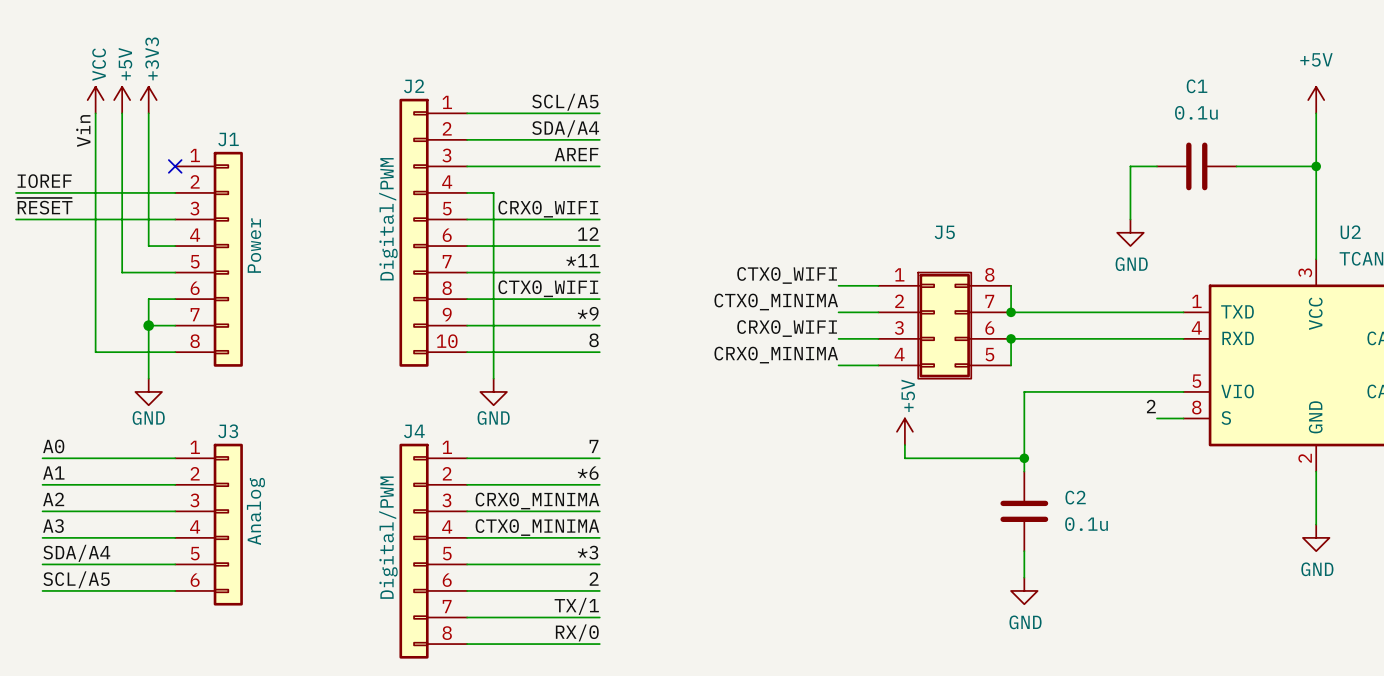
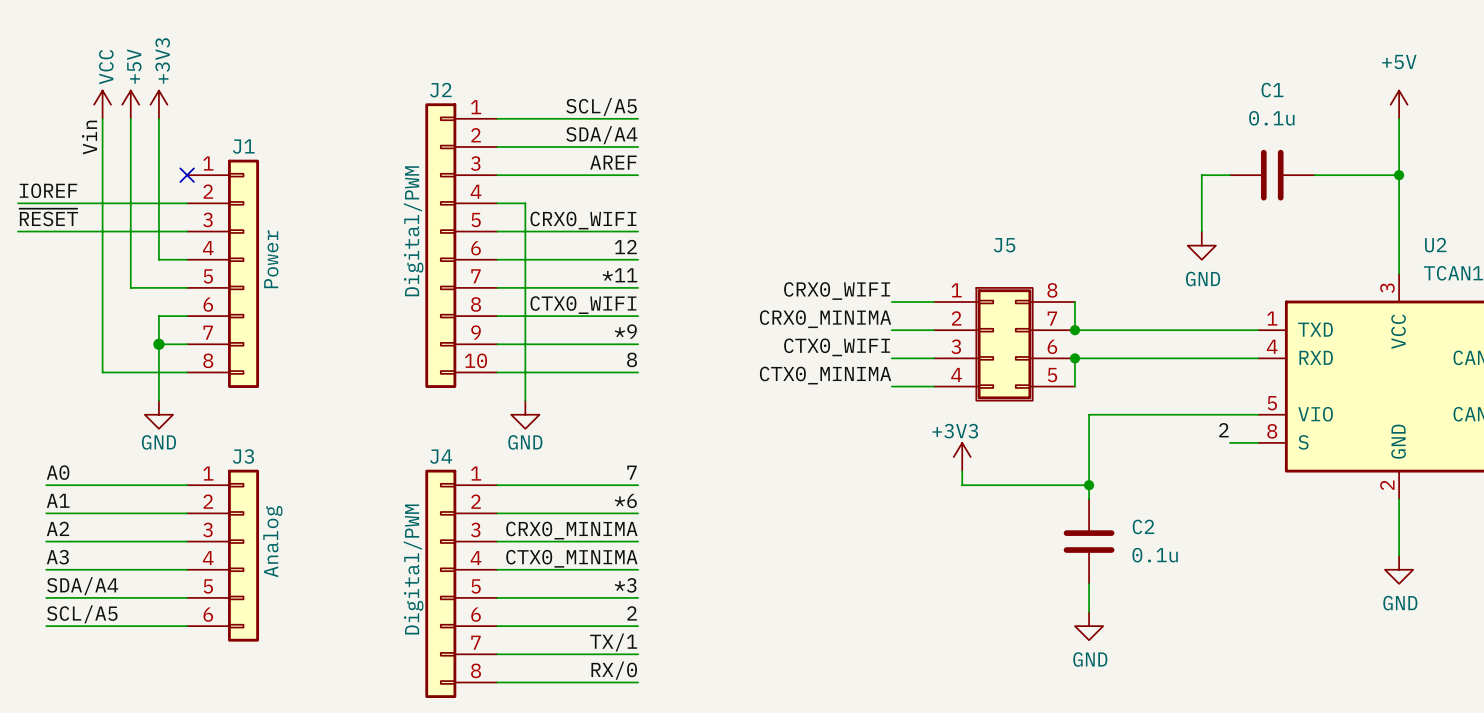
label: CTX0_WIFI (787, 275) -> CRX0_WIFI (837, 291)
label: CTX0_MINIMA (776, 302) -> CRX0_MINIMA (825, 319)
label: CRX0_WIFI (787, 328) -> CTX0_WIFI (837, 347)
label: CRX0_MINIMA (776, 355) -> CTX0_MINIMA (825, 375)
power symbol: +5V (904, 431) -> +3V3 (962, 457)

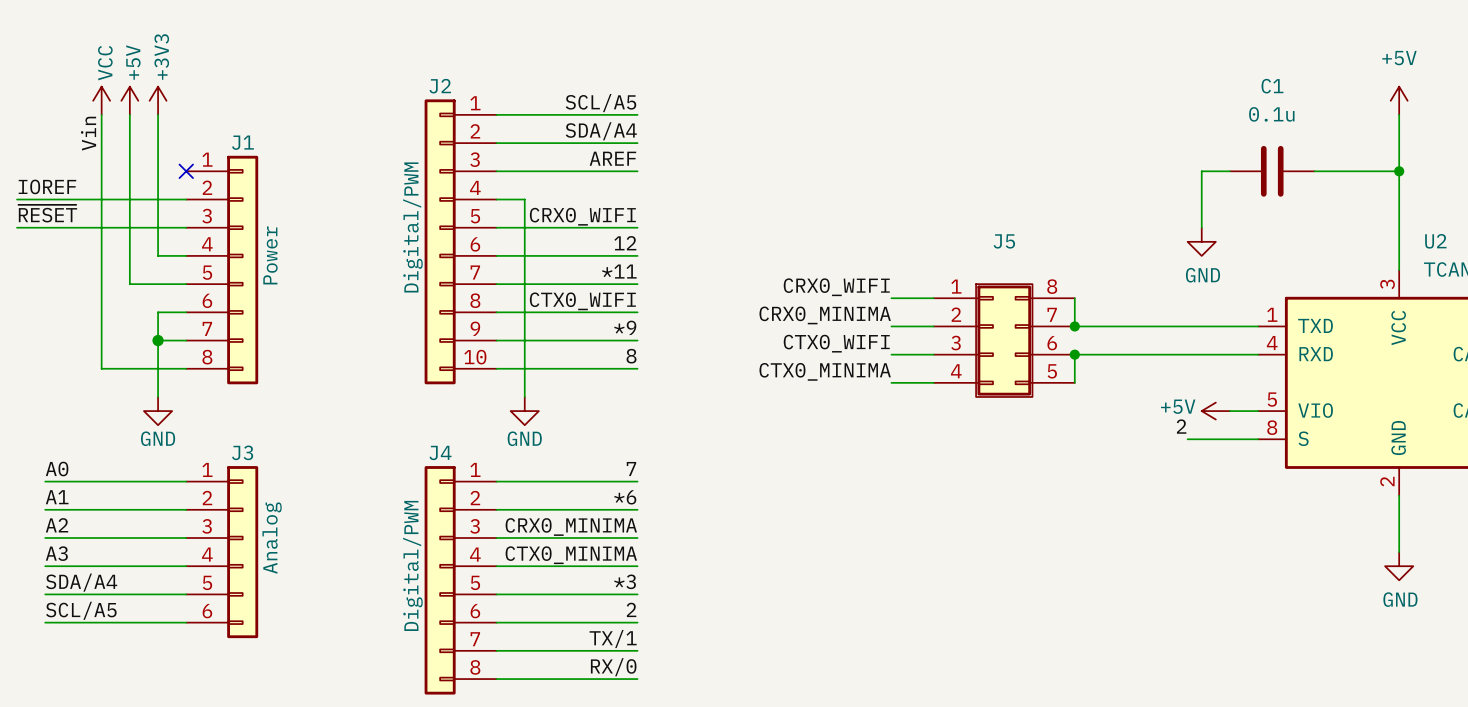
power symbol: none -> +5V (1215, 411)
wire: (1229, 414) (1089, 414) (1089, 499) -> none
label position: 2 (1223, 430) -> 2 (1181, 426)
wire: none -> (1187, 439) (1229, 439)
power symbol: +3V3 (962, 457) -> none
wire: (962, 471) (962, 485) (1089, 485) -> none
junction: (1089, 485) -> none
C2: 0.1u (1089, 541) -> none
wire: (1089, 583) (1089, 612) -> none
power symbol: GND (1089, 626) -> none

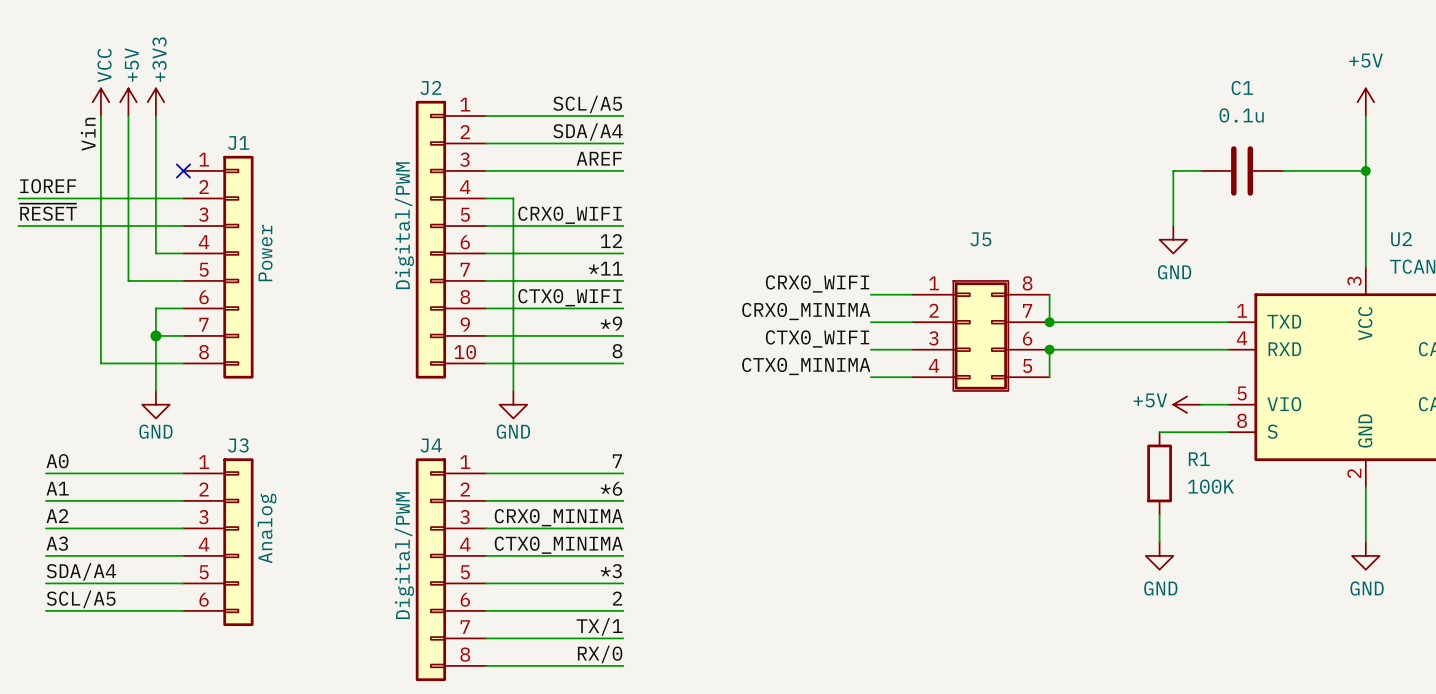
label: 2 (1181, 426) -> none
R1: none -> 100K (1159, 473)
wire: none -> (1159, 514) (1159, 542)
power symbol: none -> GND (1159, 555)

